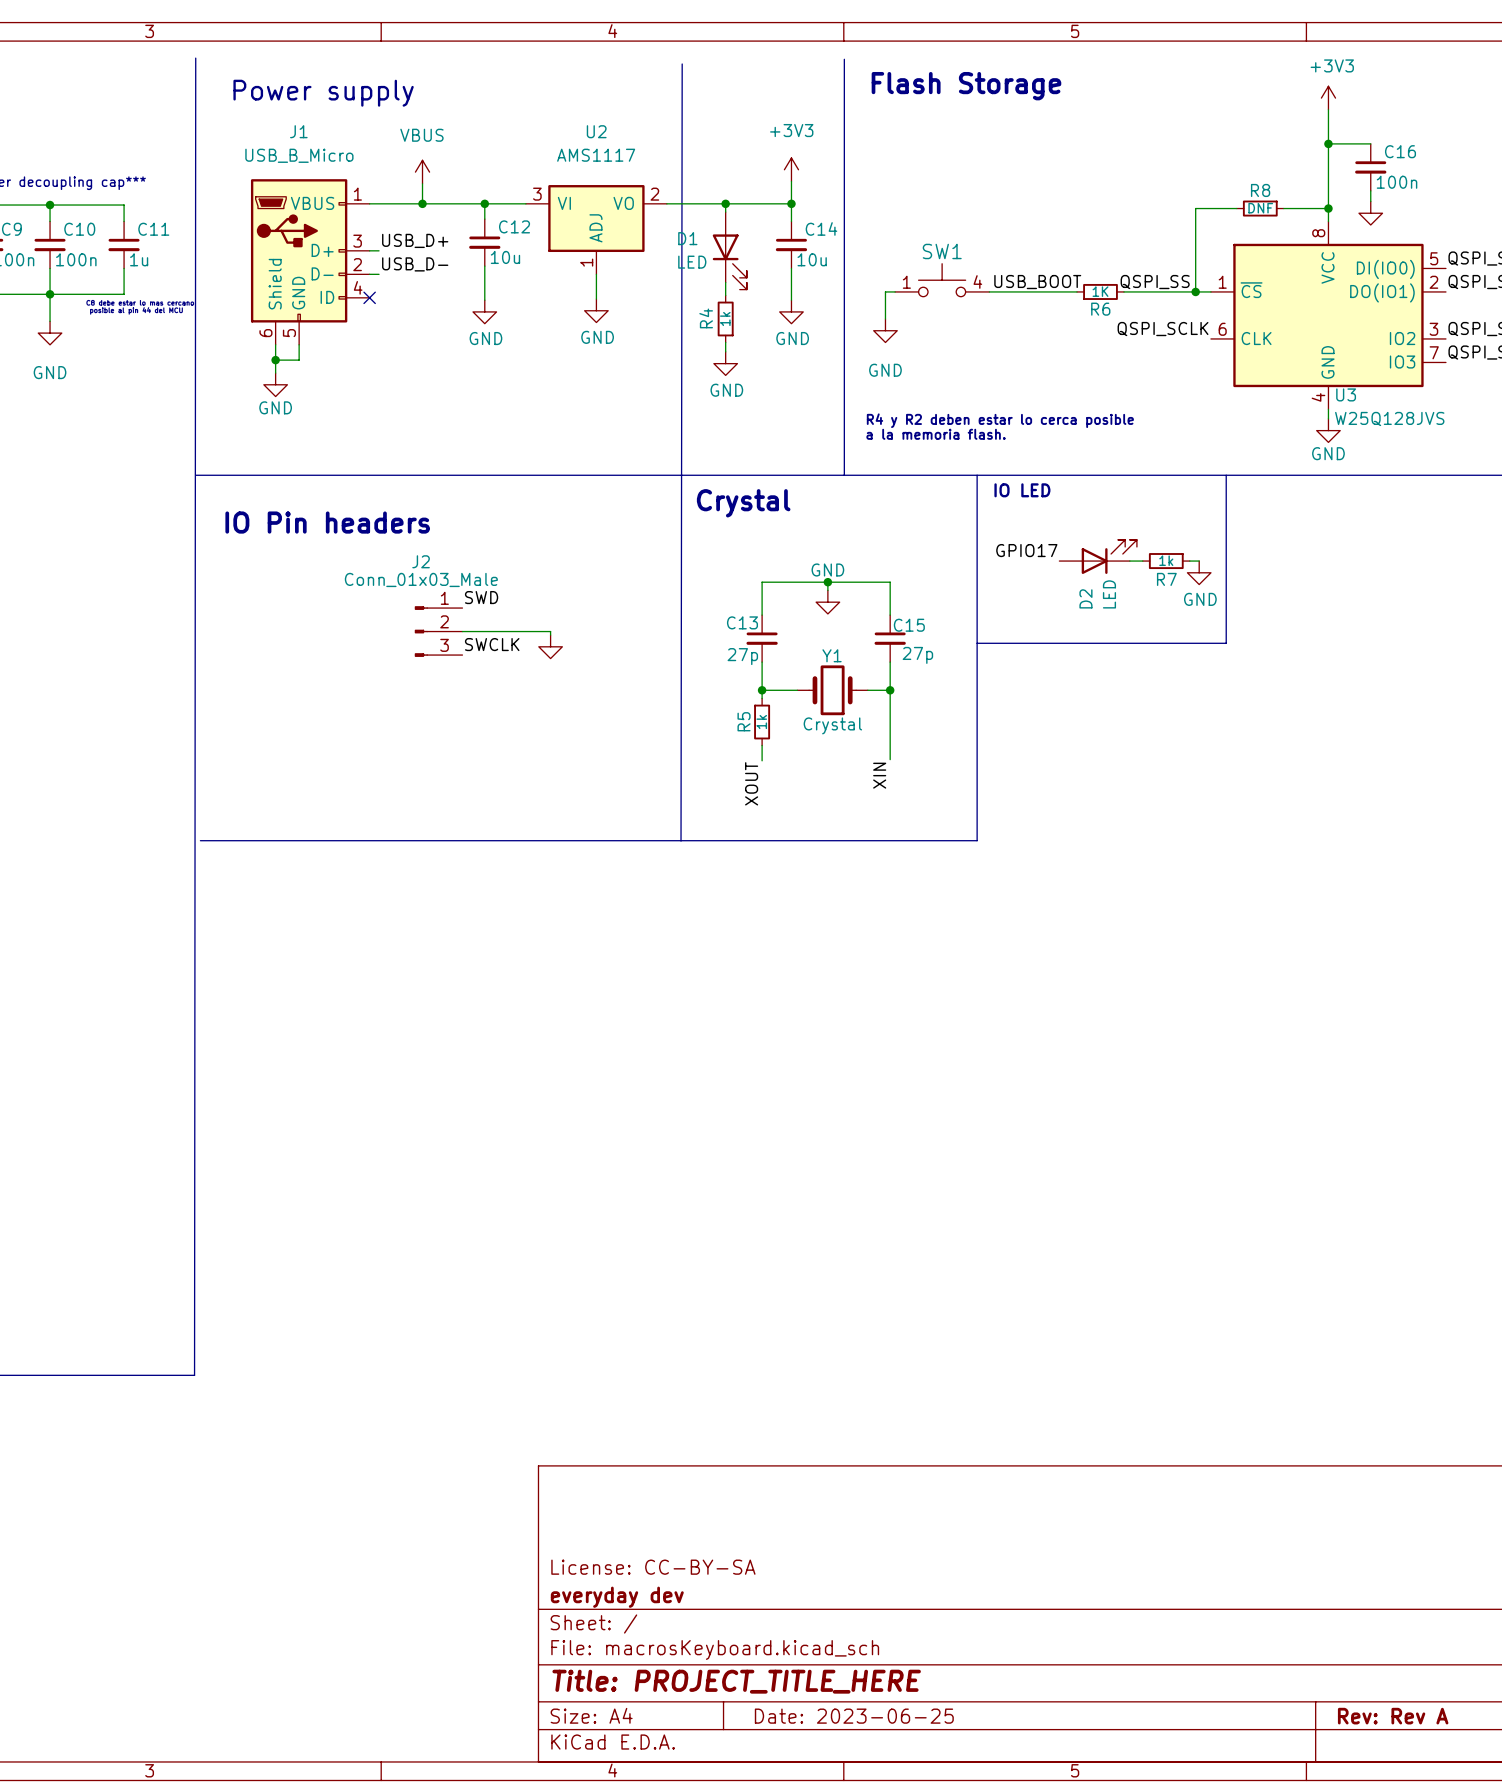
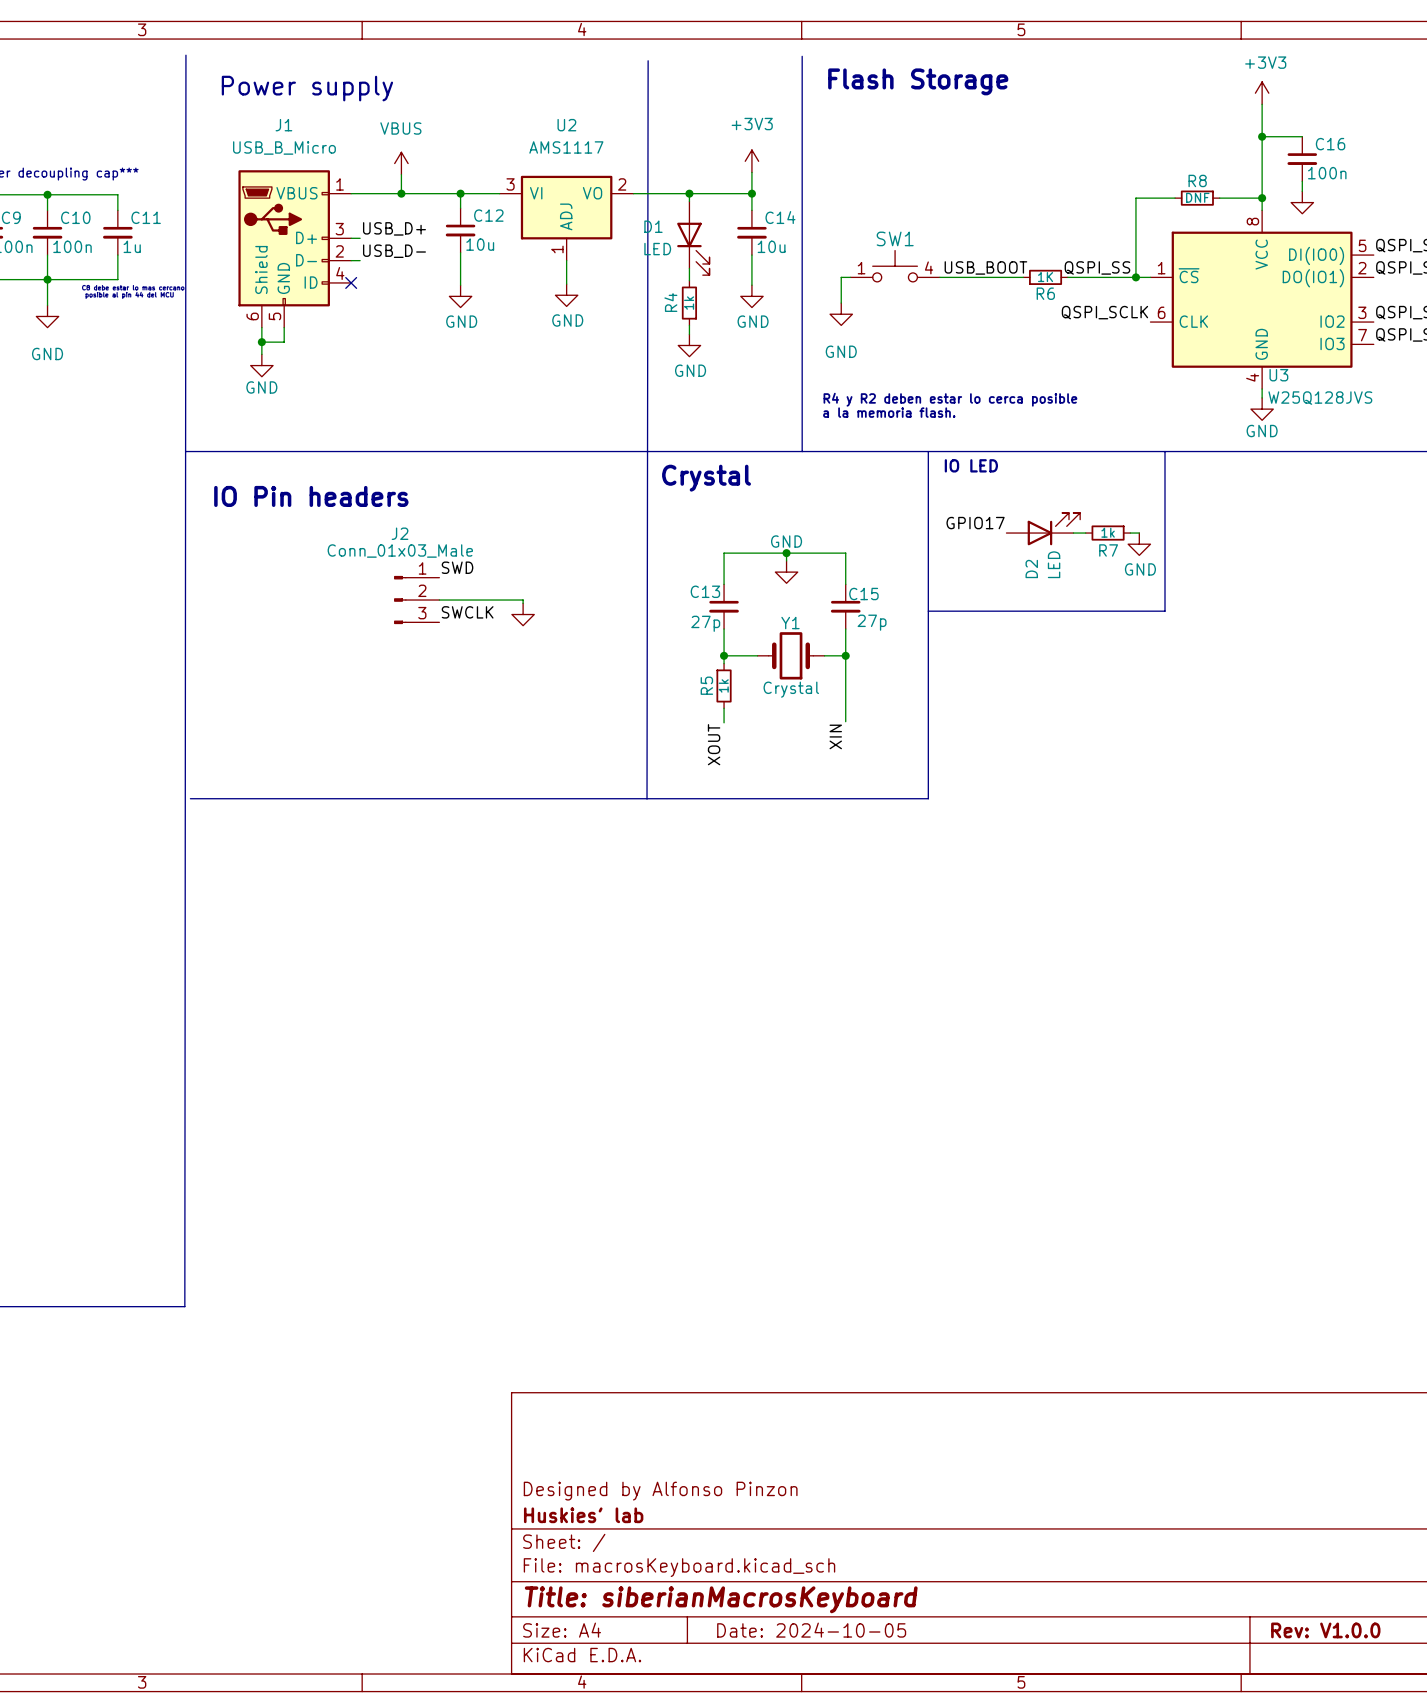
title block: License: CC-BY-SA (653, 1567) -> Designed by Alfonso Pinzon (660, 1491)
title block: everyday dev (617, 1597) -> Huskies' lab (583, 1515)
title block: Title: PROJECT_TITLE_HERE (736, 1681) -> Title: siberianMacrosKeyboard (721, 1599)
title block: Date: 2023-06-25 (854, 1716) -> Date: 2024-10-05 (811, 1630)
title block: Rev: Rev A (1393, 1716) -> Rev: V1.0.0 (1325, 1630)

